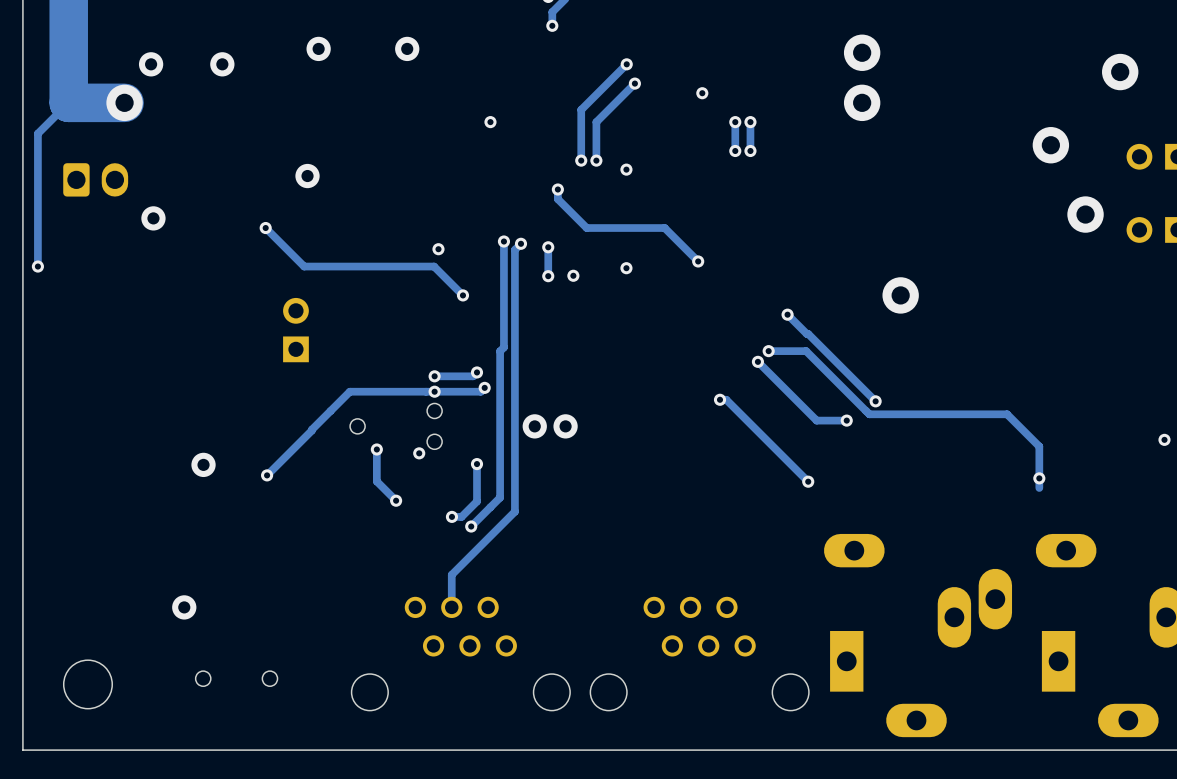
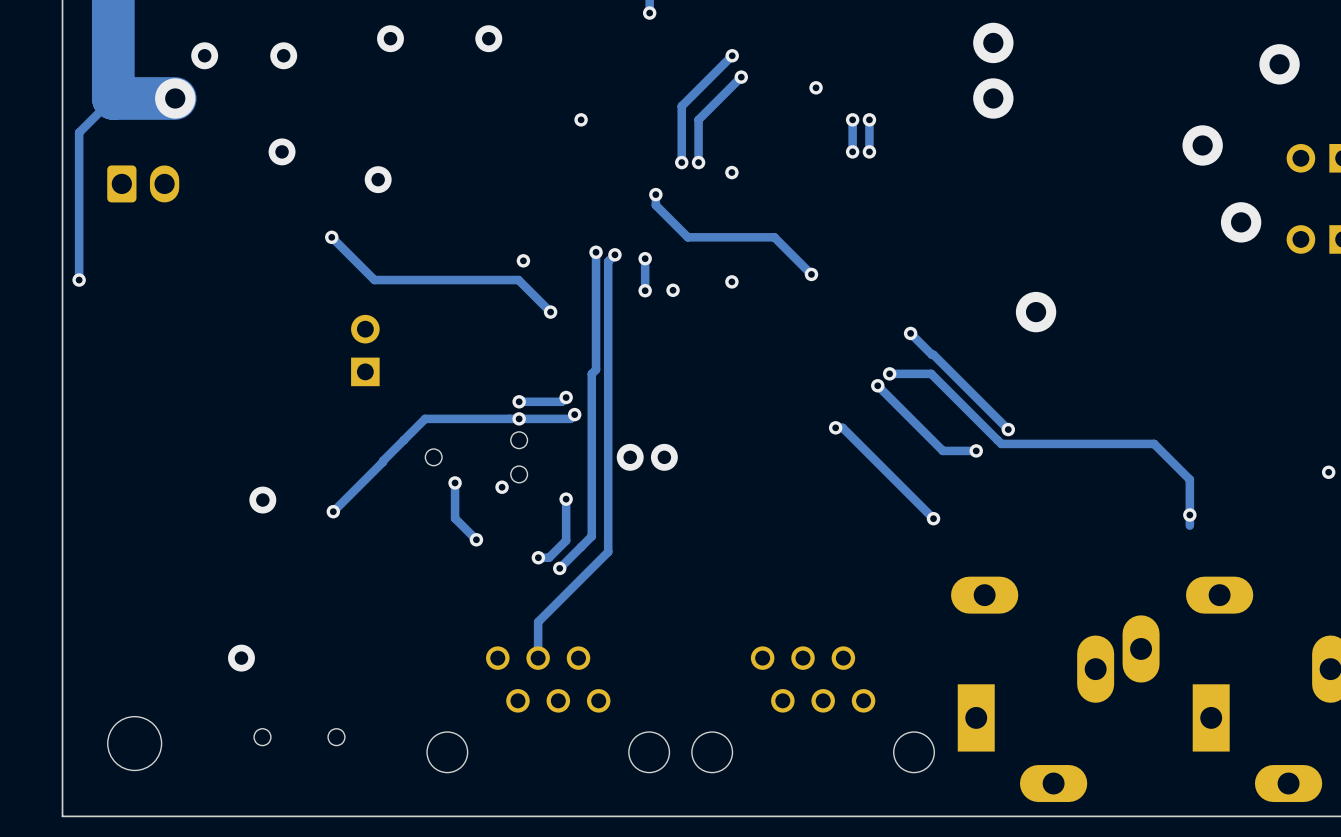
via: none -> (282, 151)
via: (153, 218) -> none

